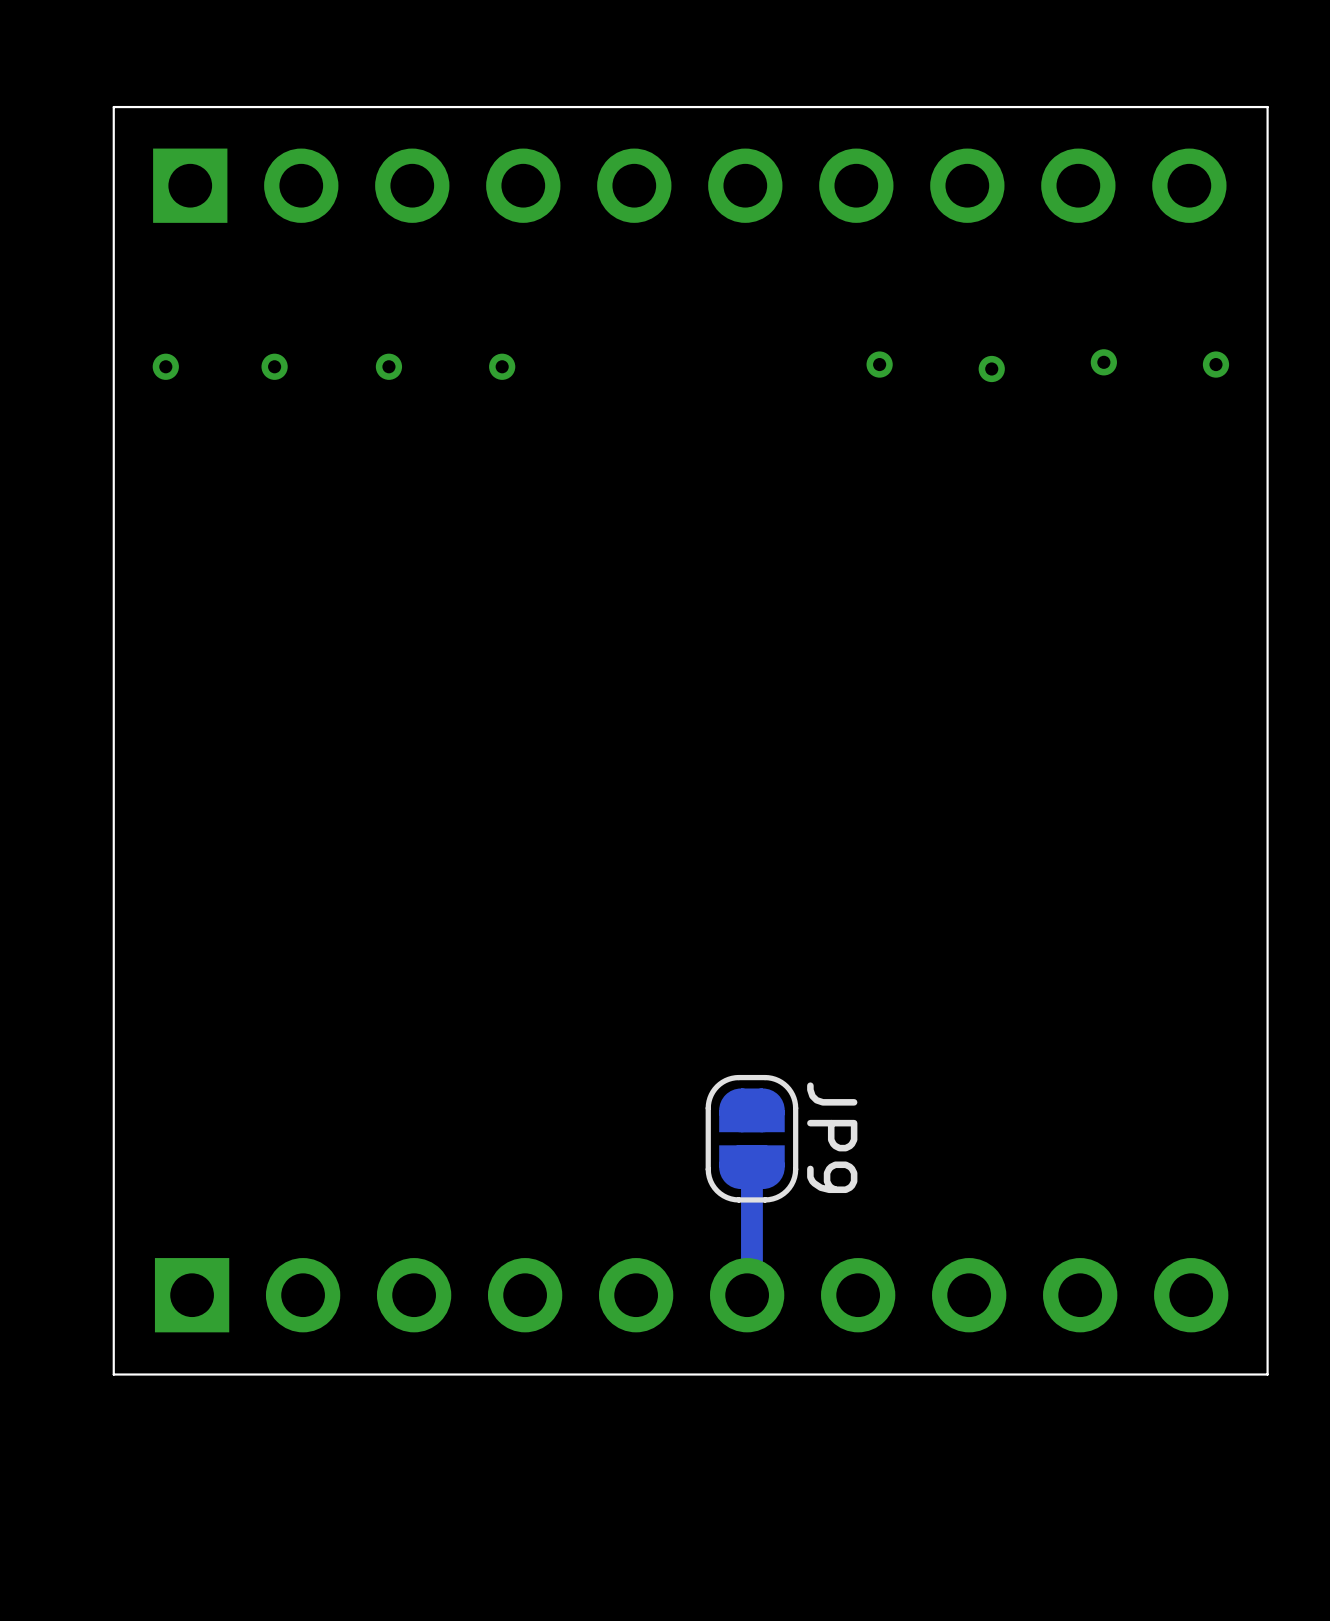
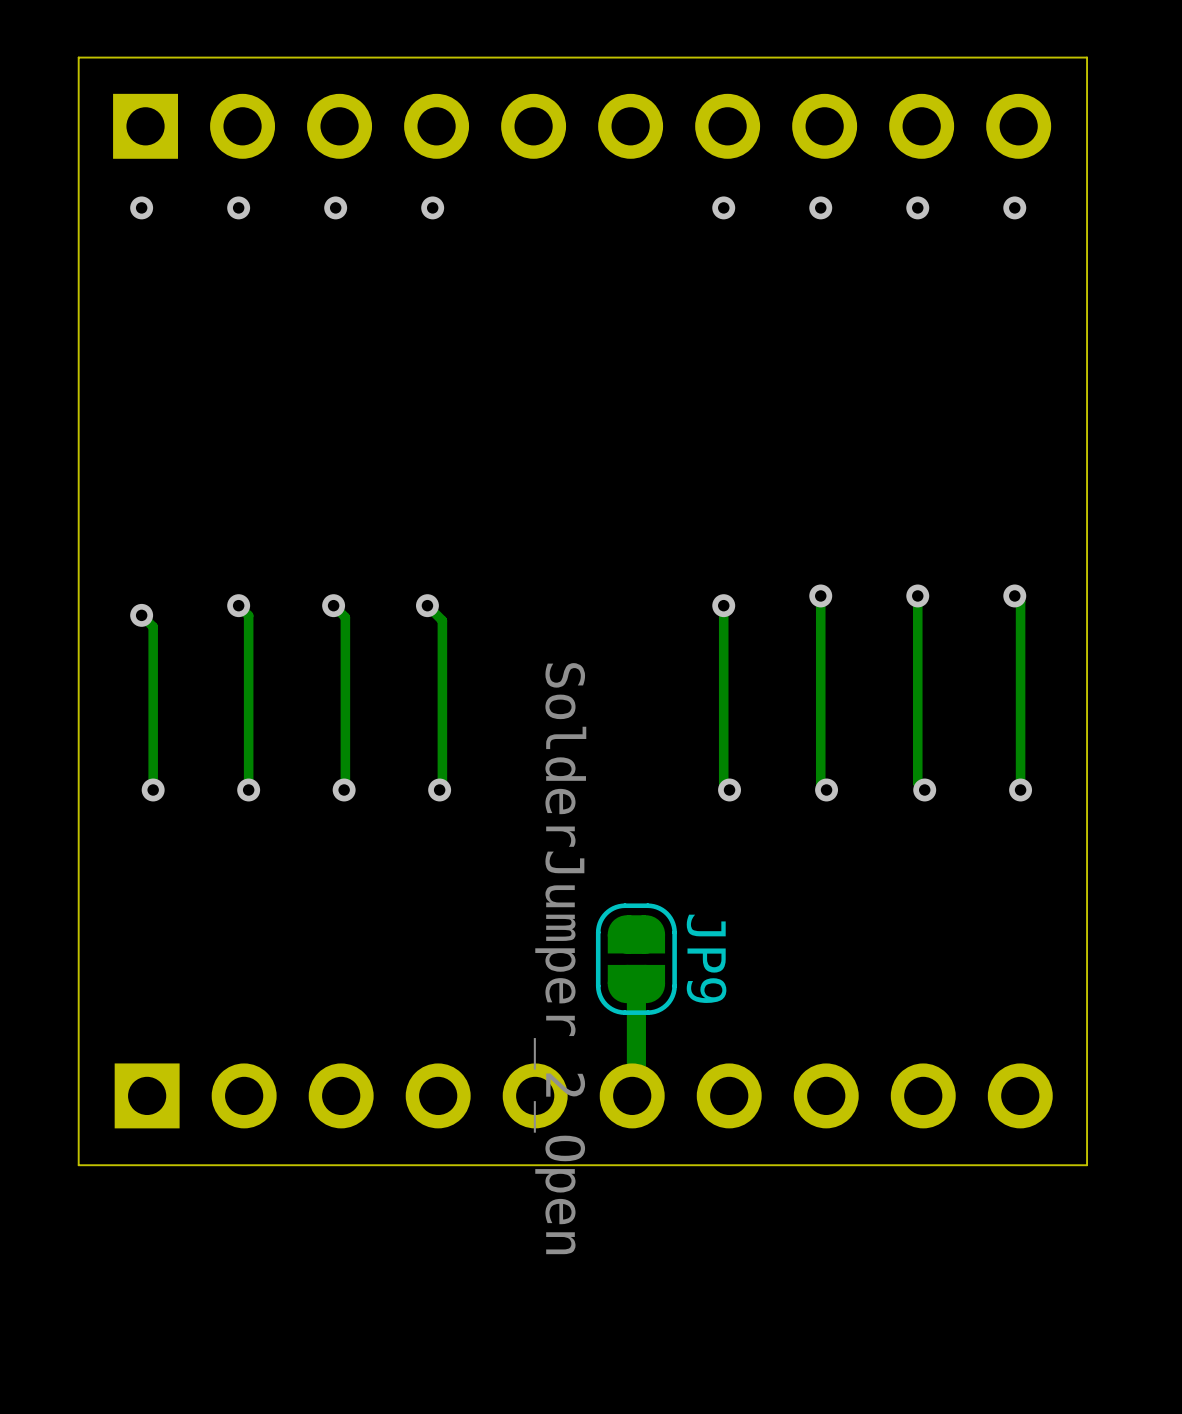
via: none -> (141, 207)
via: none -> (238, 207)
via: none -> (335, 207)
via: none -> (432, 207)
via: none -> (723, 207)
via: none -> (820, 207)
via: none -> (917, 207)
via: none -> (1014, 207)
via: (1103, 362) -> none
via: (879, 364) -> none
via: (1215, 364) -> none
via: (165, 366) -> none
via: (274, 366) -> none
via: (388, 366) -> none
via: (502, 366) -> none
via: (991, 368) -> none
track: none -> (820, 595) (820, 784) (826, 789)
via: none -> (820, 595)
track: none -> (917, 595) (917, 783) (924, 789)
via: none -> (917, 595)
track: none -> (1014, 595) (1020, 601) (1020, 789)
via: none -> (1014, 595)
track: none -> (238, 605) (248, 615) (248, 789)
via: none -> (238, 605)
track: none -> (333, 605) (345, 617) (344, 789)
via: none -> (333, 605)
track: none -> (427, 605) (442, 620) (442, 787) (439, 789)
via: none -> (427, 605)
track: none -> (723, 605) (723, 784) (729, 789)
via: none -> (723, 605)
track: none -> (141, 615) (153, 626) (153, 789)
via: none -> (141, 615)
via: none -> (153, 789)
via: none -> (248, 789)
via: none -> (344, 789)
via: none -> (439, 789)
via: none -> (729, 789)
via: none -> (826, 789)
via: none -> (924, 789)
via: none -> (1020, 789)
JP9 value: none -> SolderJumper_2_Open (560, 958)

